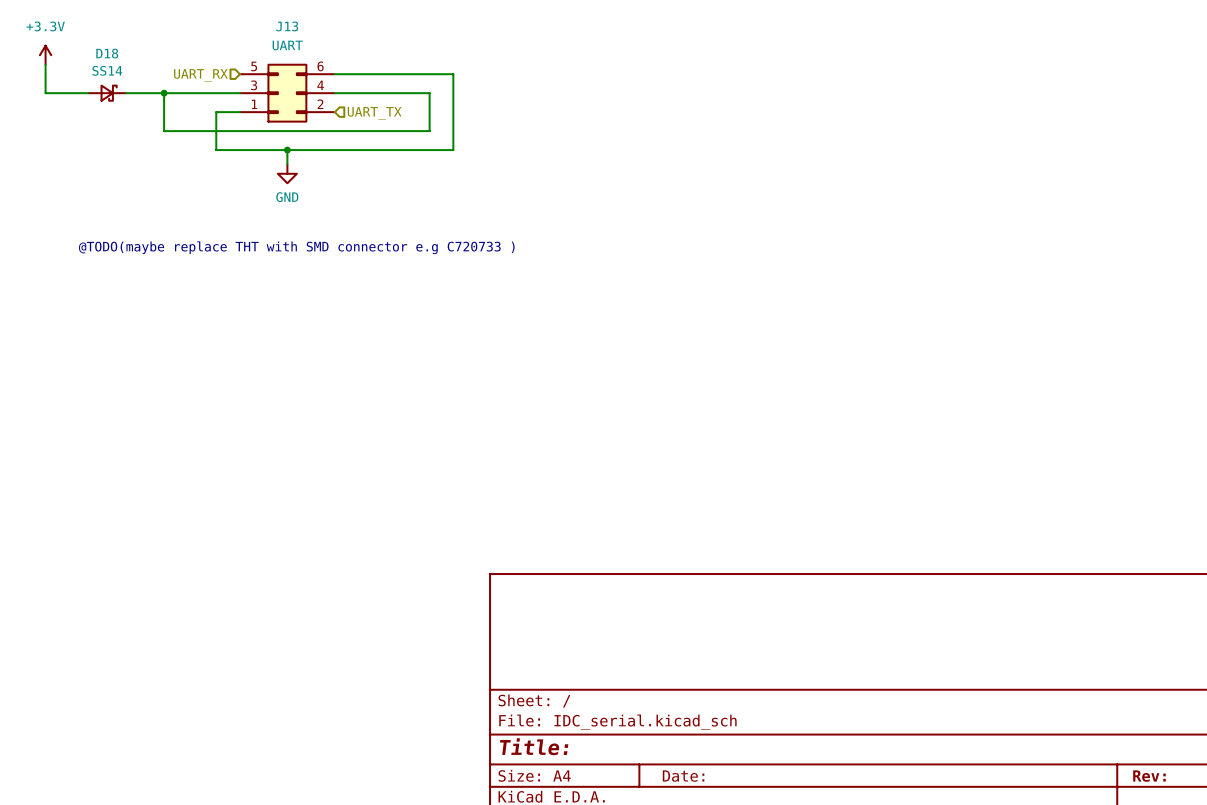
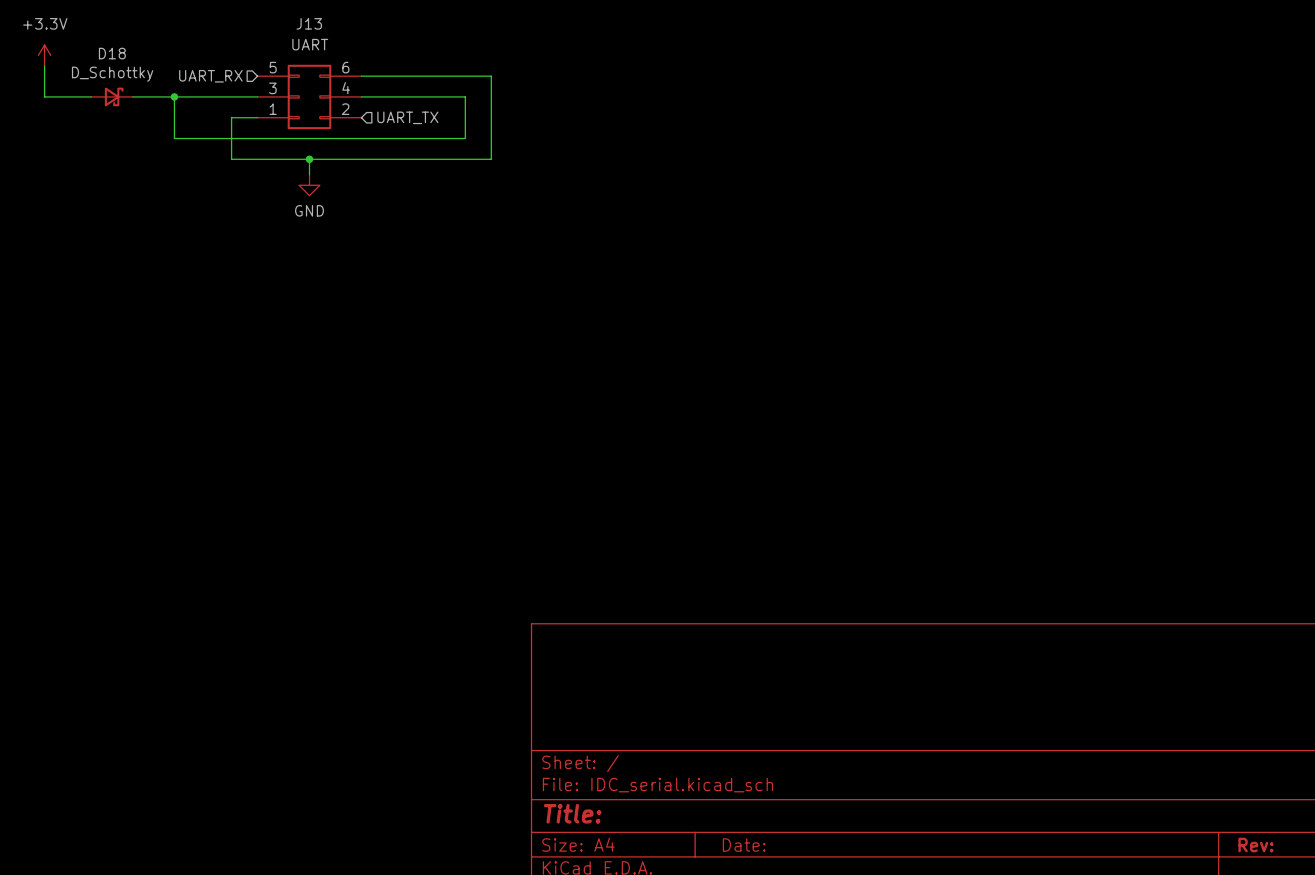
D18 value: SS14 (107, 70) -> D_Schottky (112, 74)
text: @TODO(maybe replace THT with SMD connector e.g C720733 ) (296, 247) -> none

